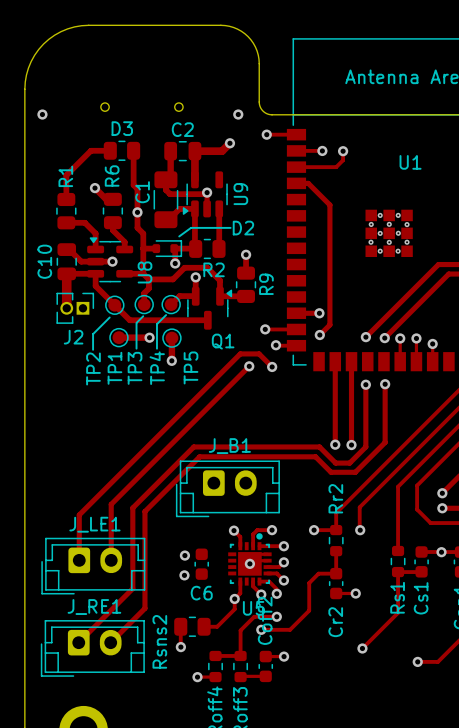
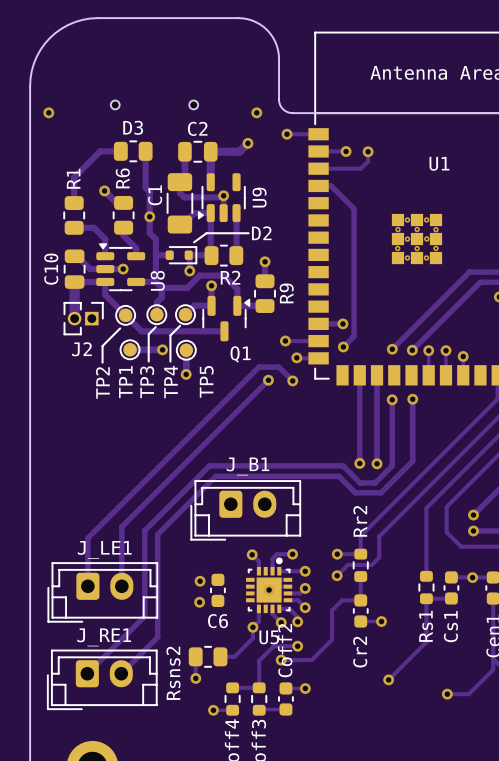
track: (359, 507) (360, 530) -> (385, 529) (379, 536) (379, 557) (371, 565) (347, 565) (337, 575)
via position: (360, 530) -> (337, 575)

